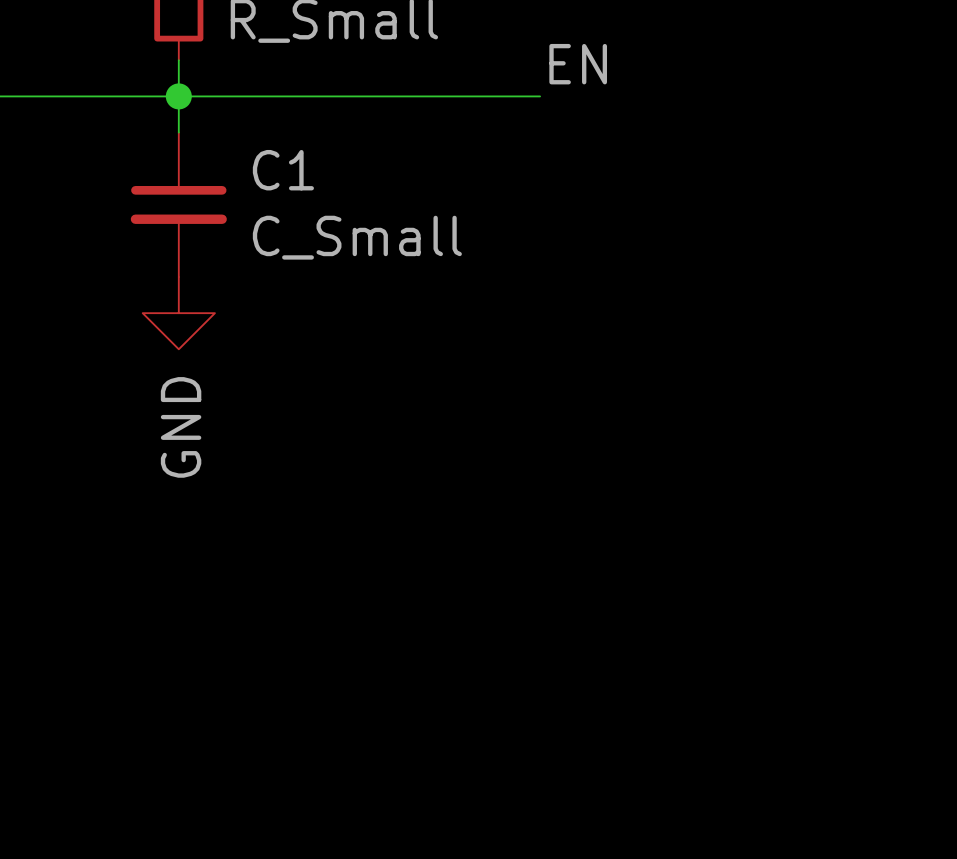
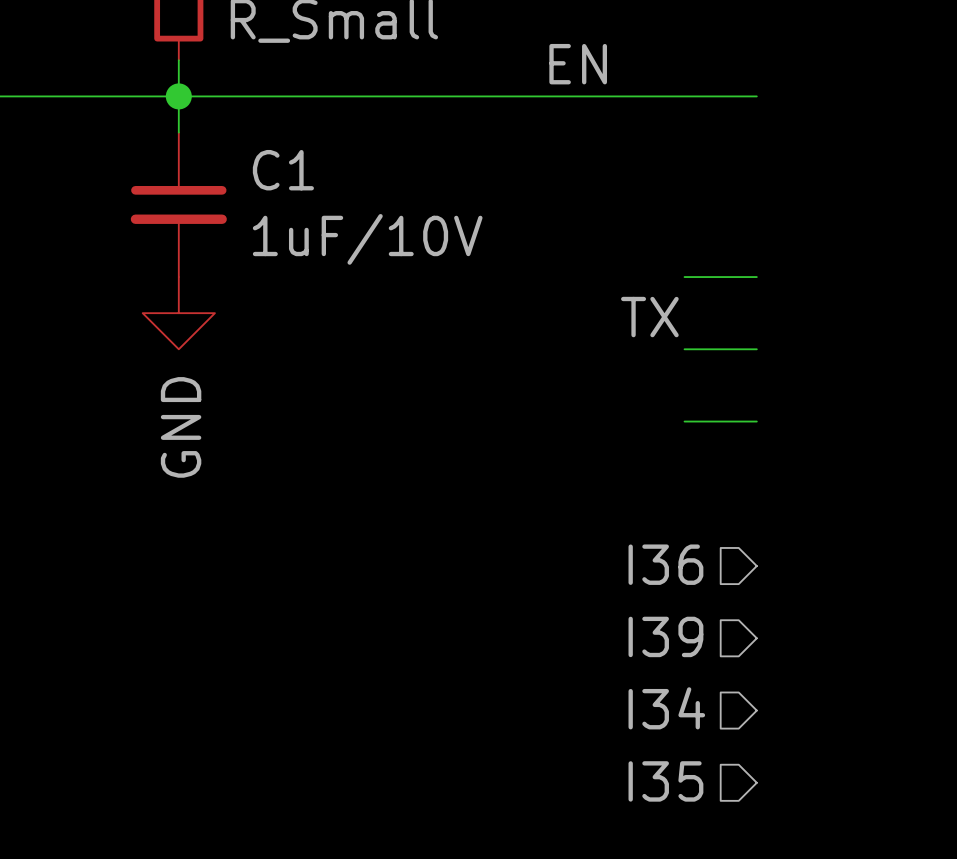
wire: none -> (540, 96) (756, 96)
C1 value: C_Small (357, 237) -> 1uF/10V (367, 239)
wire: none -> (684, 277) (756, 277)
label: none -> TX (649, 317)
wire: none -> (684, 349) (756, 349)
wire: none -> (684, 421) (756, 421)
hierarchical label: none -> I36 (665, 564)
hierarchical label: none -> I39 (665, 636)
hierarchical label: none -> I34 (666, 708)
hierarchical label: none -> I35 (665, 781)

